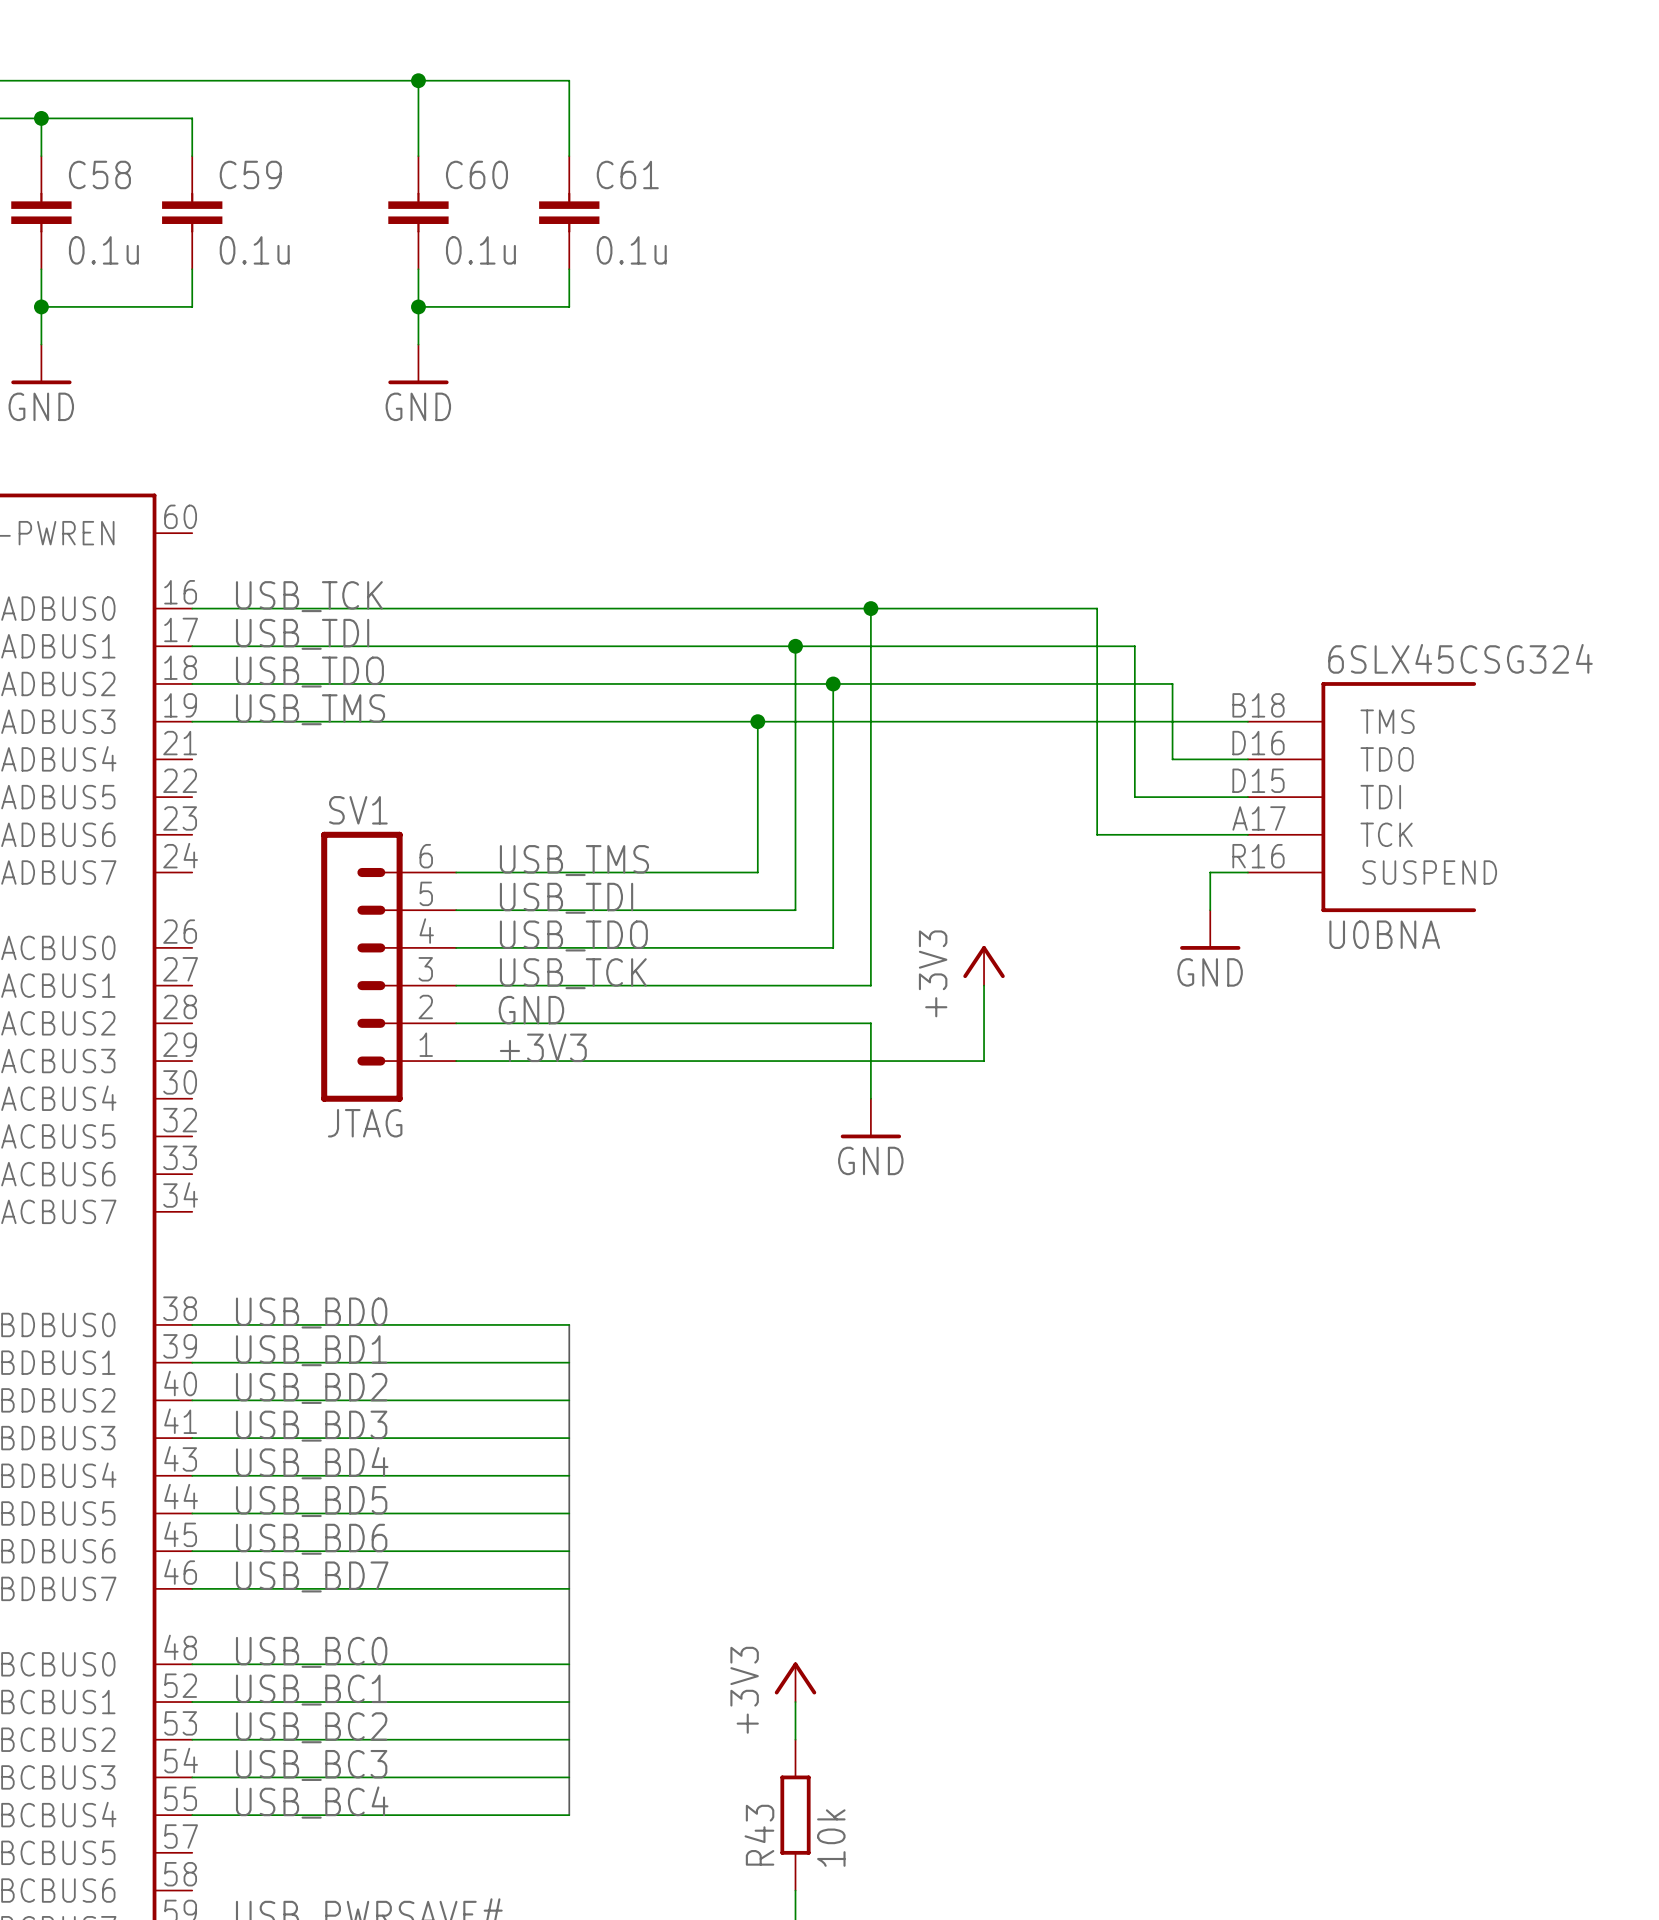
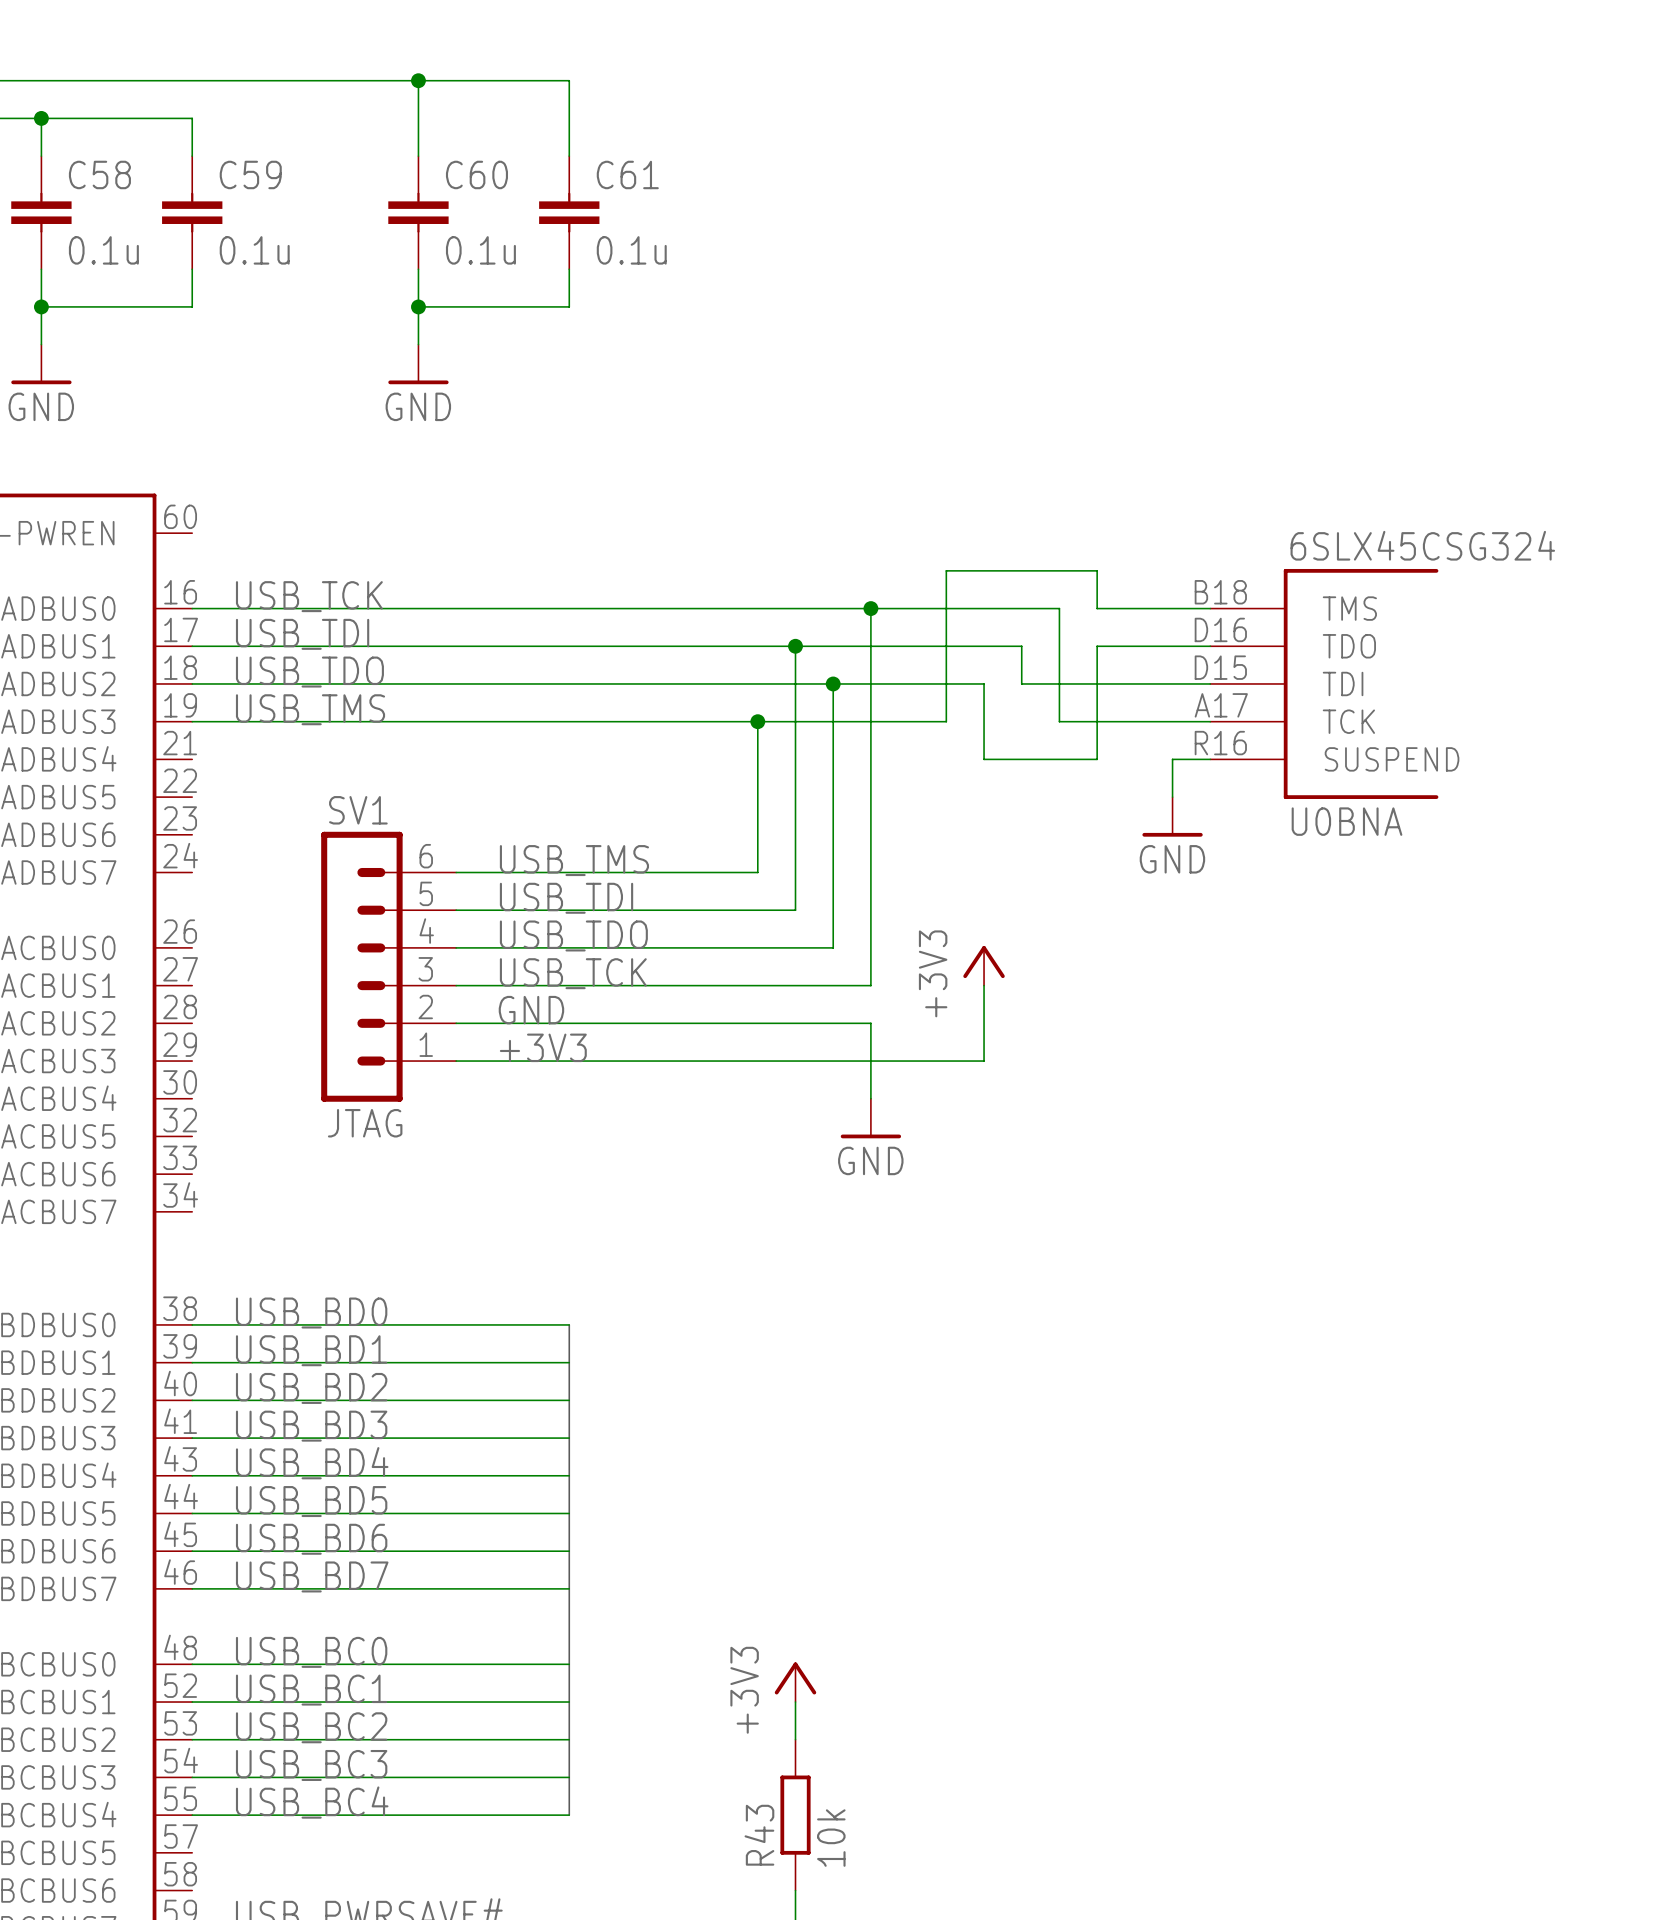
wire: (1059, 608) (1097, 608) (1097, 646) (1021, 646) -> (1059, 608) (1059, 721)
wire: (1134, 646) (1134, 797) (1247, 797) -> (1134, 646) (1210, 646)
wire: (984, 683) (1021, 683) -> (1021, 646) (1021, 683)
wire: (1172, 683) (1172, 759) -> (1172, 683) (1210, 683)
wire: (946, 721) (1059, 721) -> (946, 721) (946, 570) (1097, 570) (1097, 608) (1210, 608)
wire: (1097, 759) (1097, 834) (1247, 834) -> (1097, 759) (984, 759) (984, 683)
wire: none -> (1172, 759) (1172, 797)
U0BNA position: (1362, 797) -> (1324, 683)
wire: (1247, 872) (1210, 872) (1210, 910) -> none
power symbol position: GND (1210, 930) -> GND (1172, 816)

